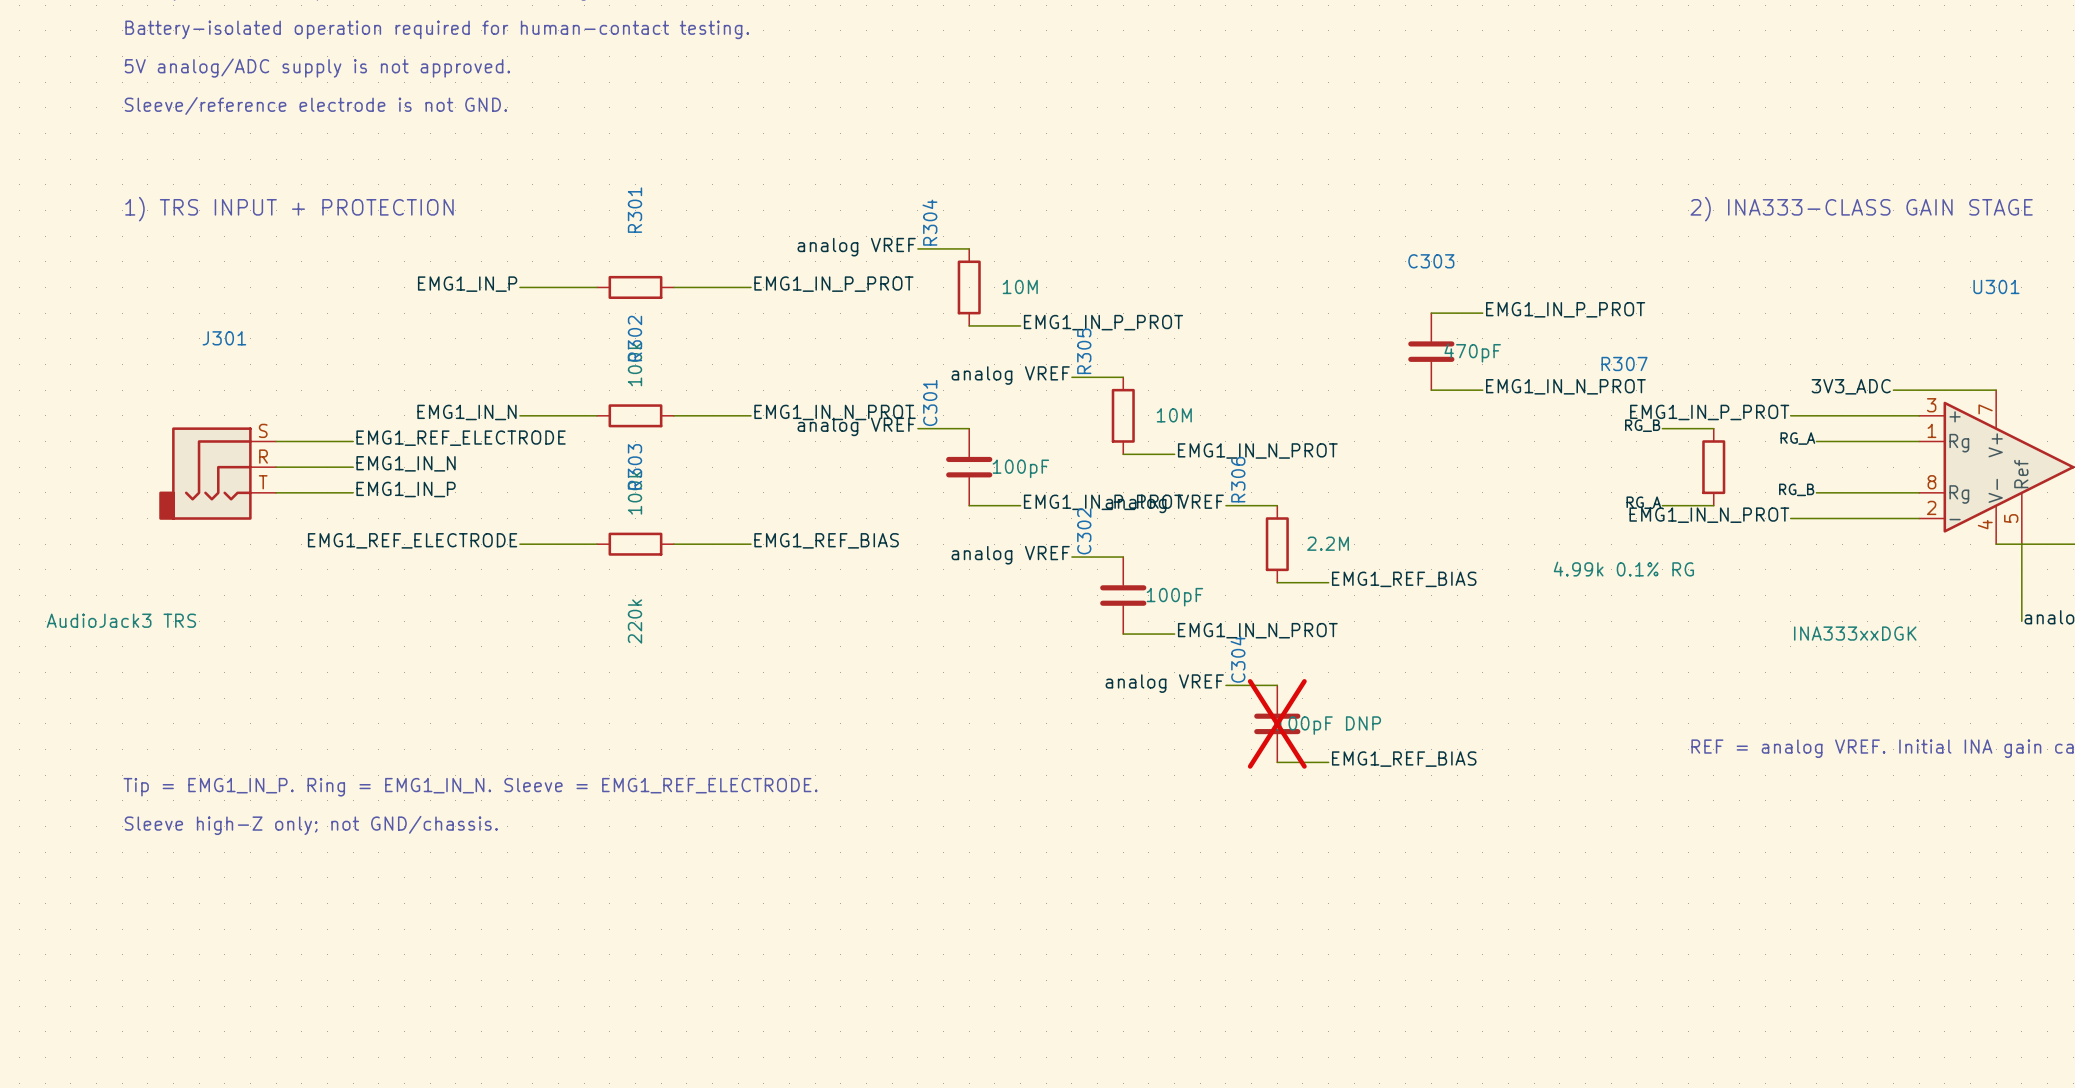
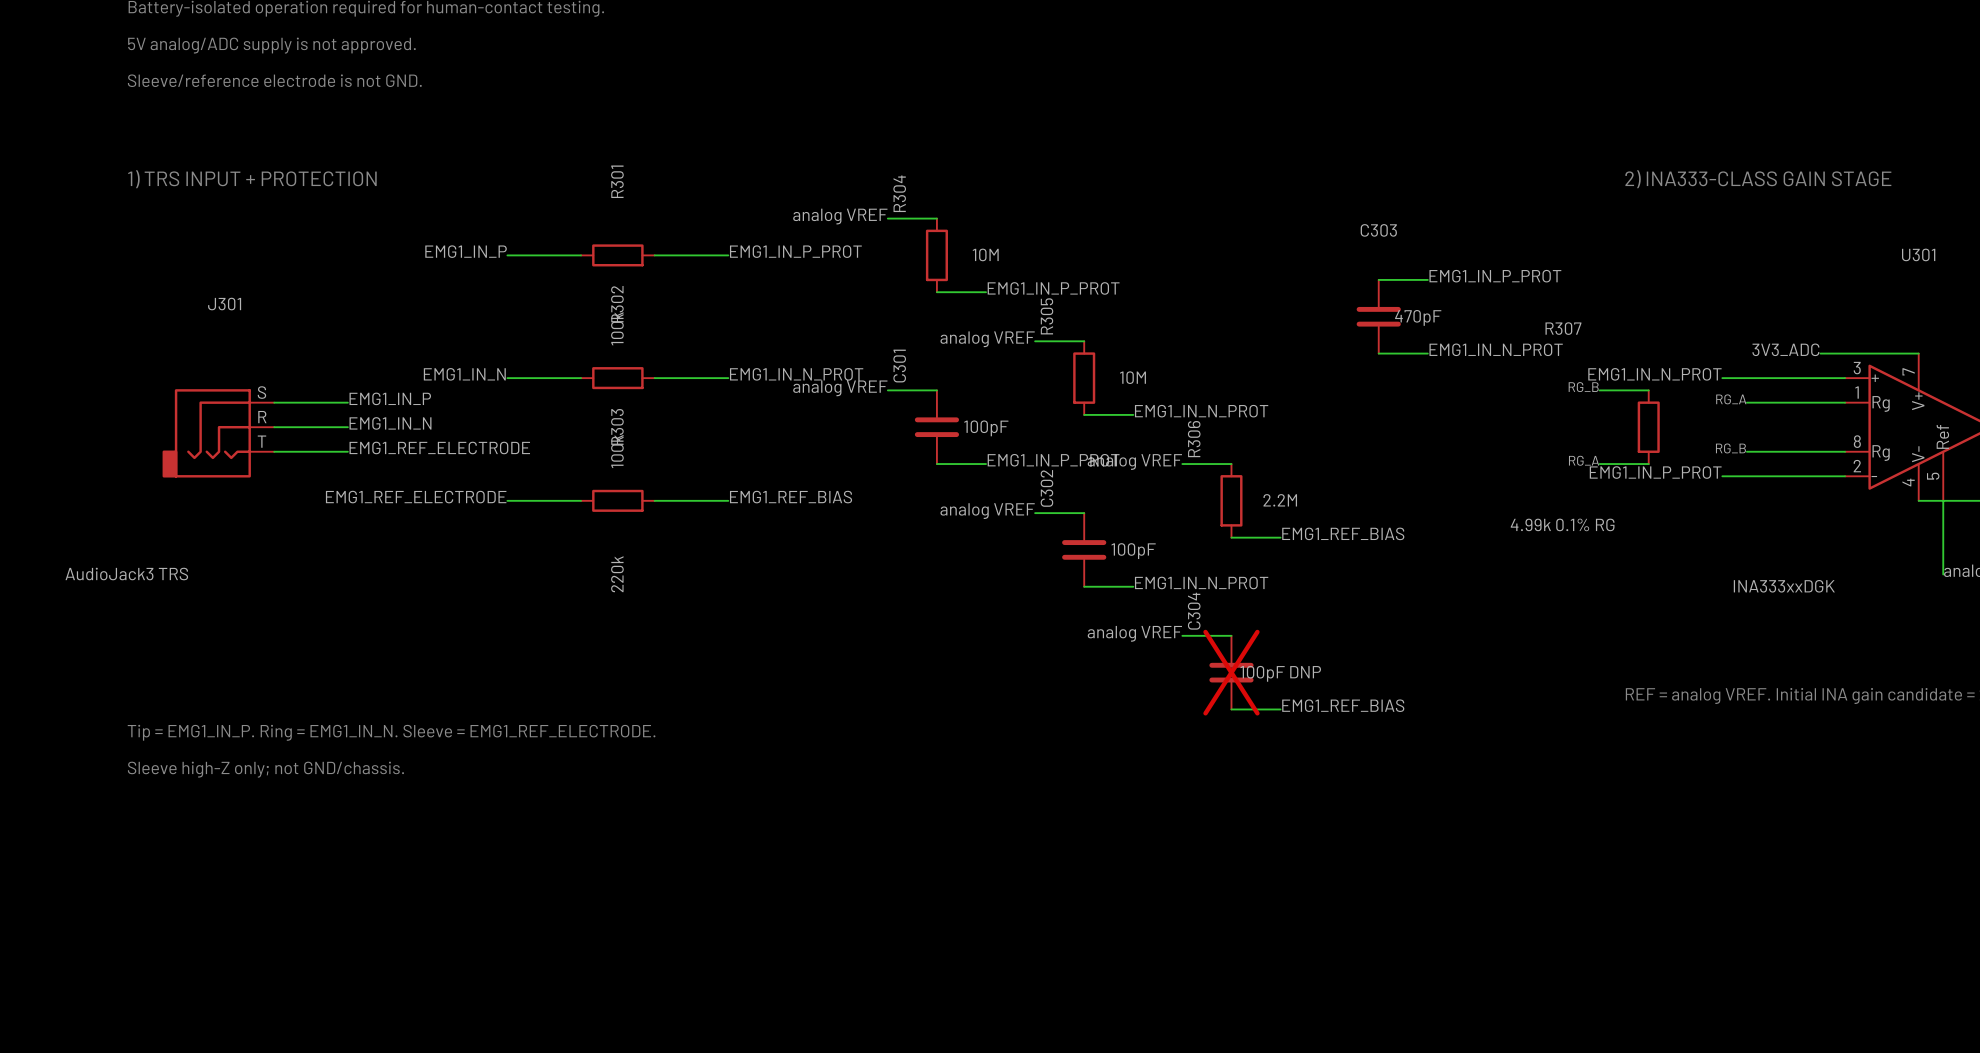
label: EMG1_IN_P_PROT (1709, 412) -> EMG1_IN_N_PROT (1654, 374)
label: EMG1_REF_ELECTRODE (461, 438) -> EMG1_IN_P (390, 398)
label: EMG1_IN_P (406, 489) -> EMG1_REF_ELECTRODE (439, 447)
label: EMG1_IN_N_PROT (1709, 515) -> EMG1_IN_P_PROT (1655, 472)

